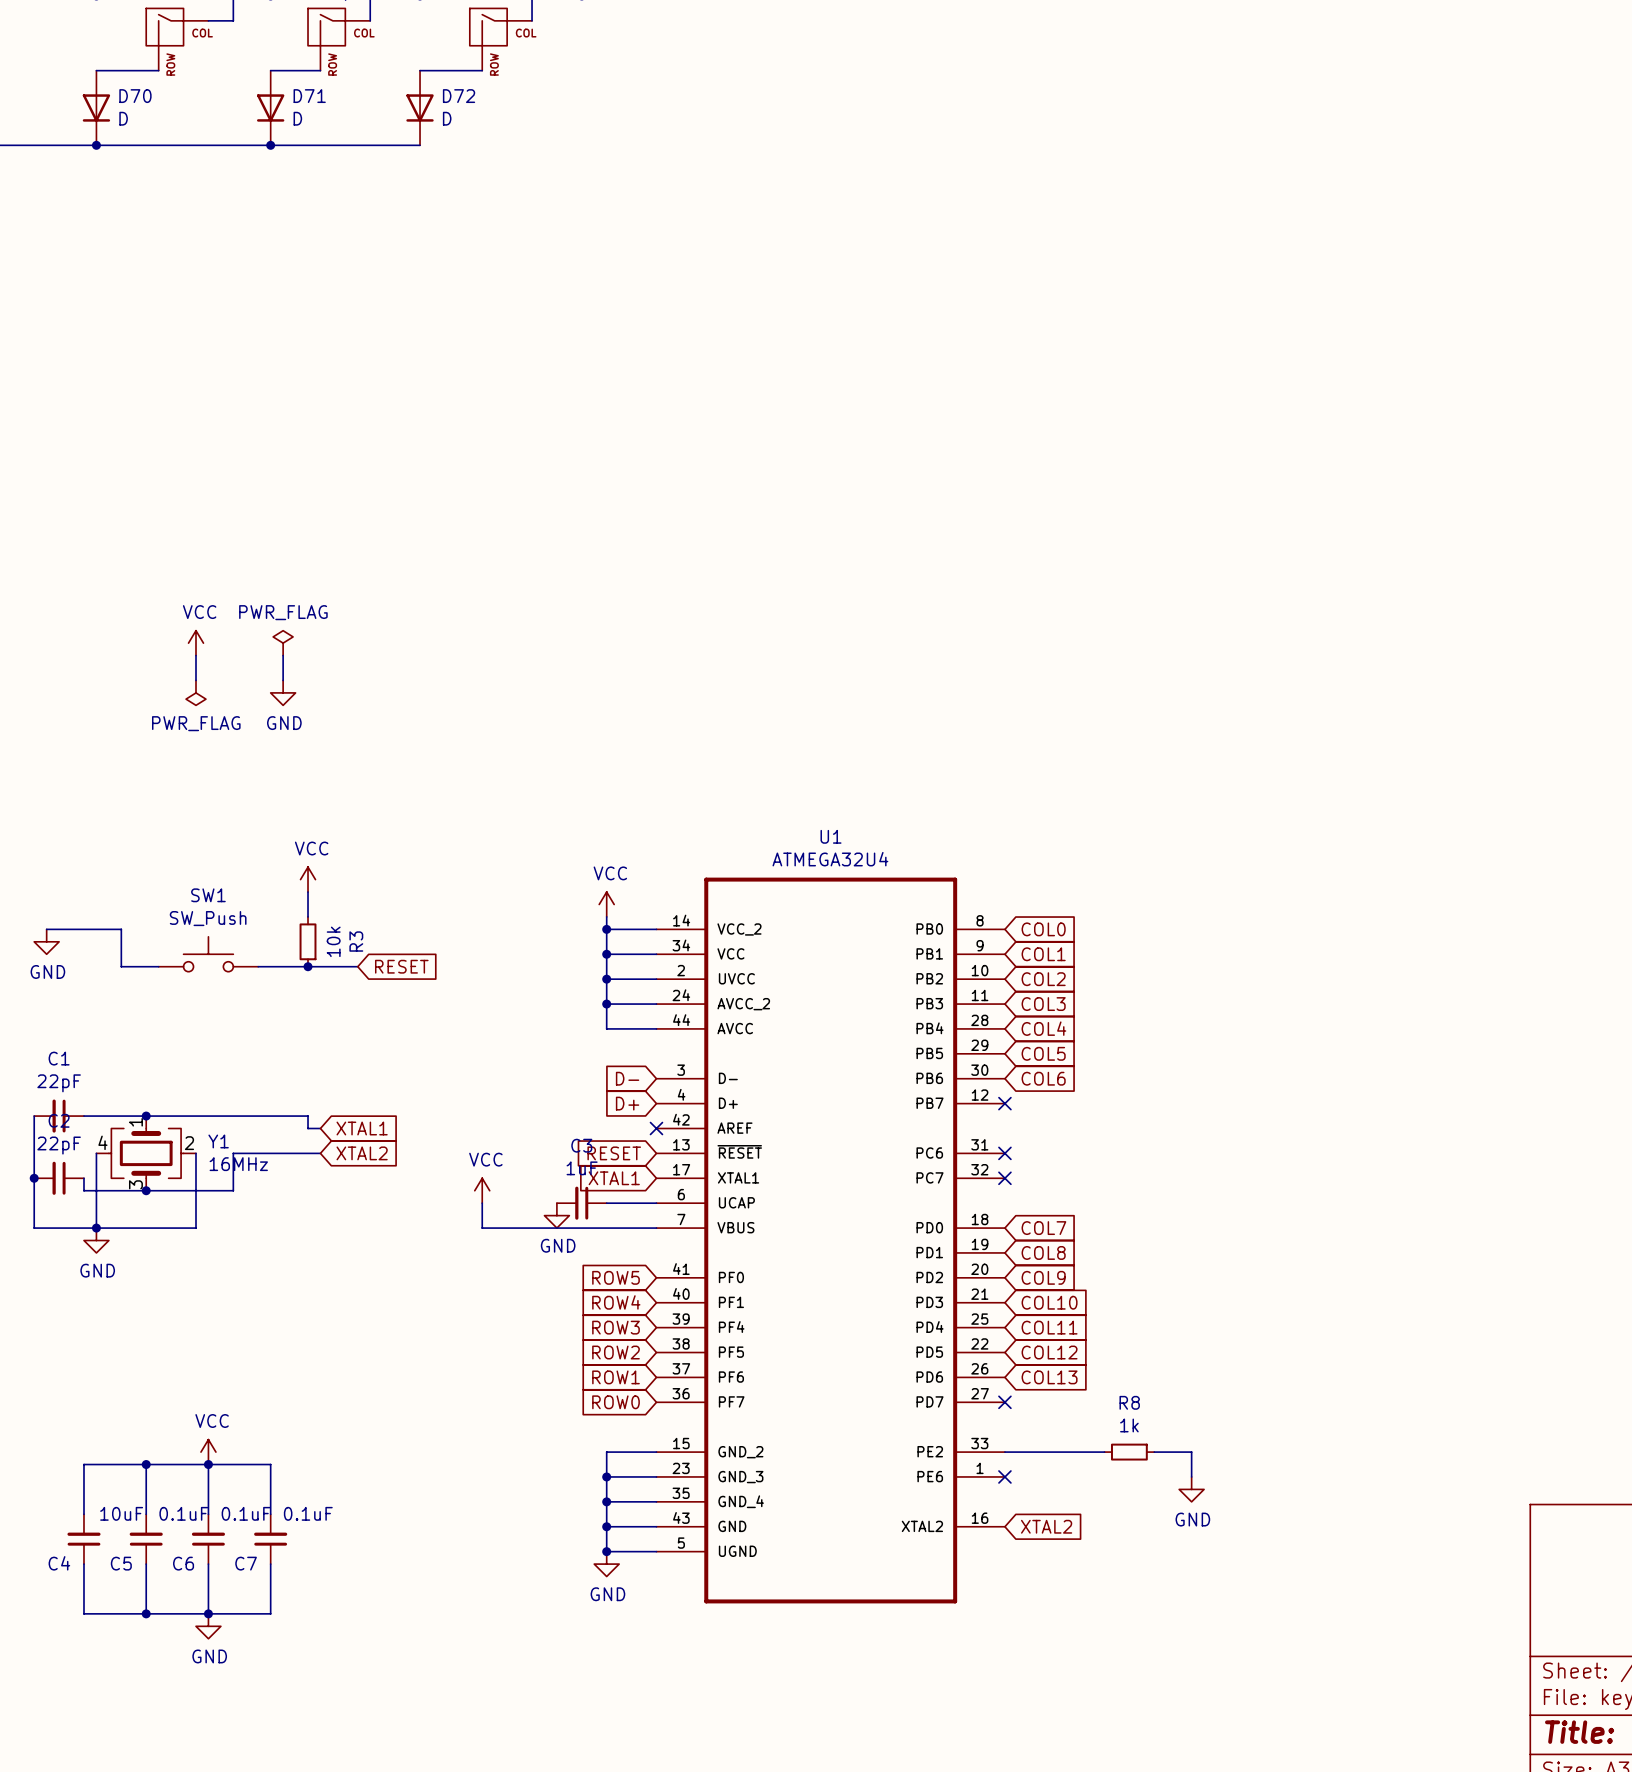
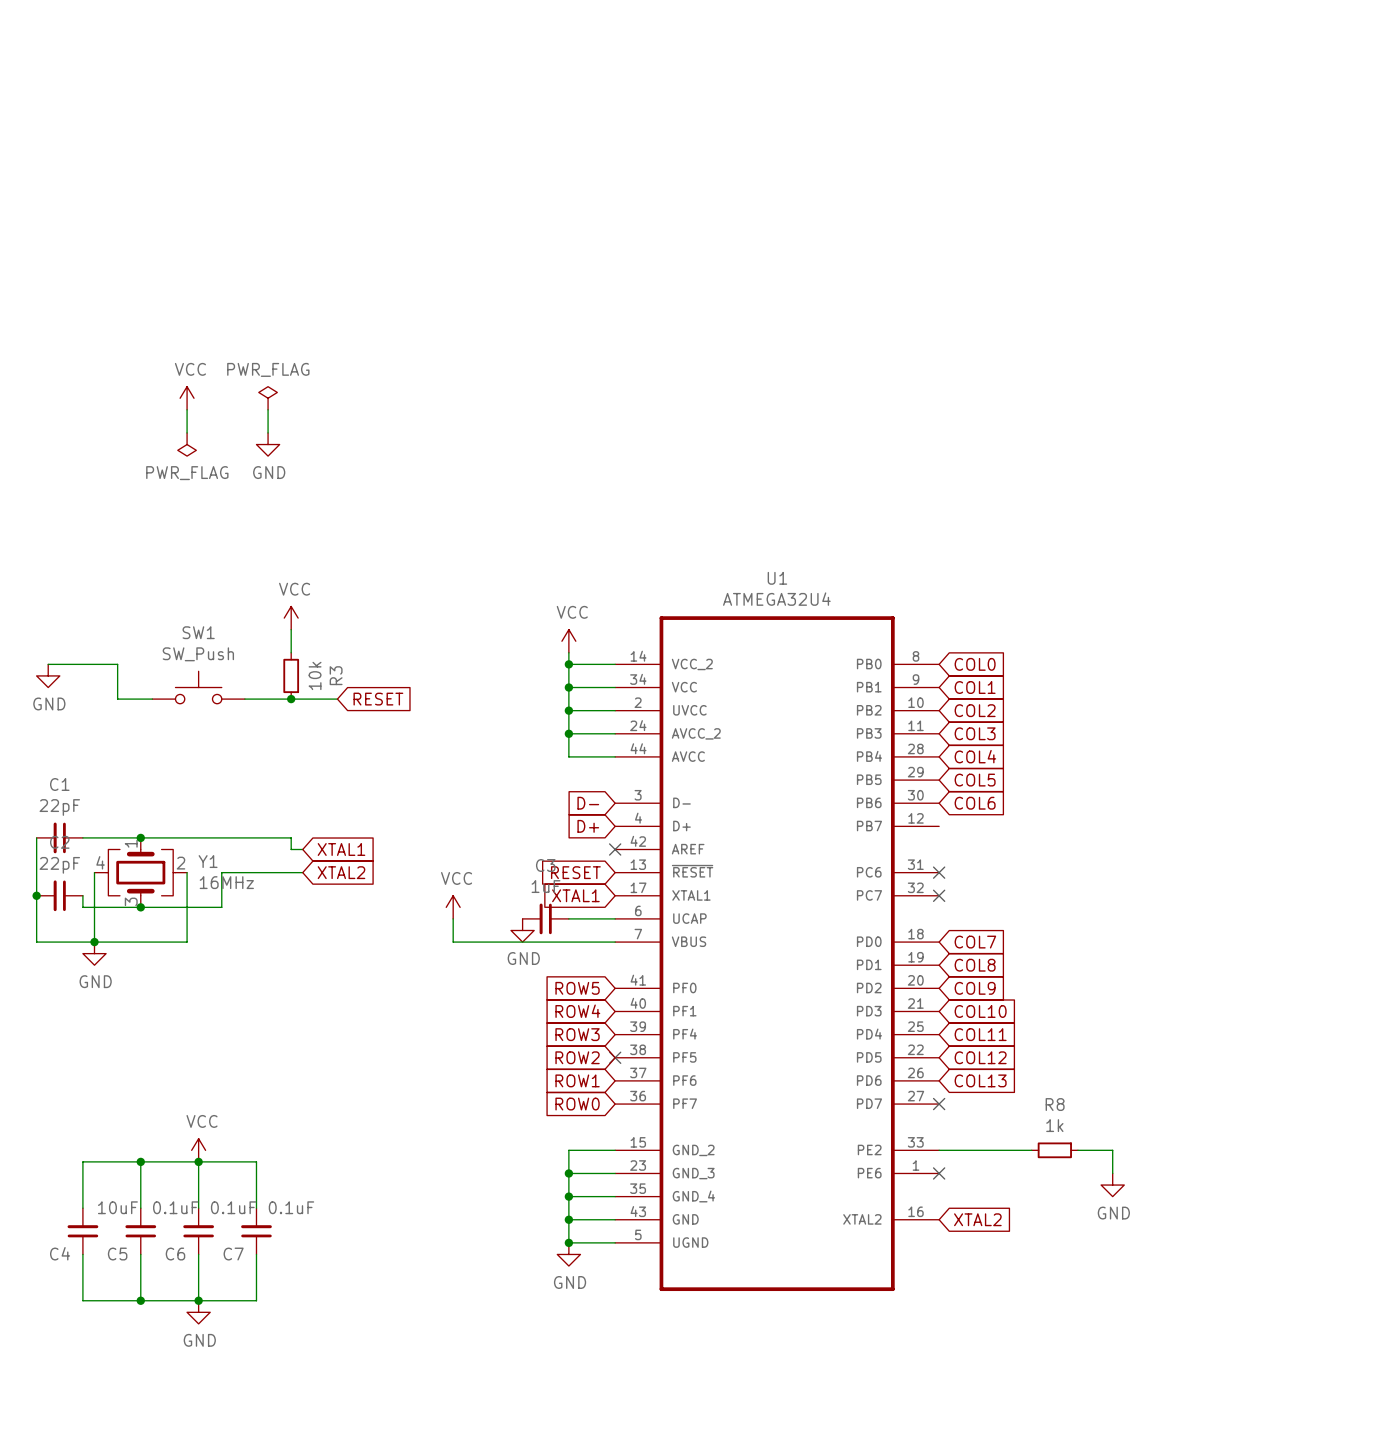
no-connect mark: (1004, 1103) -> none
no-connect mark: none -> (615, 1057)

